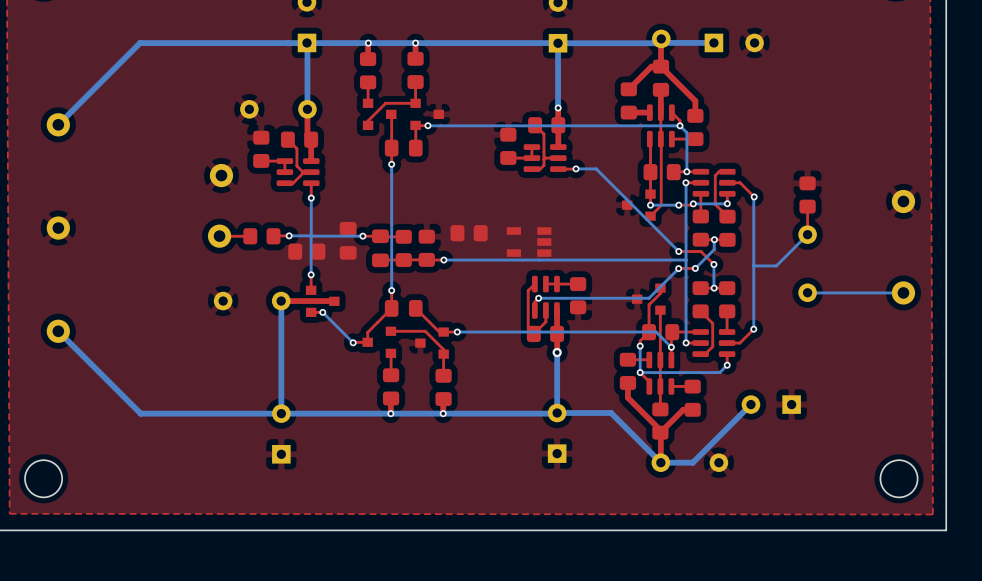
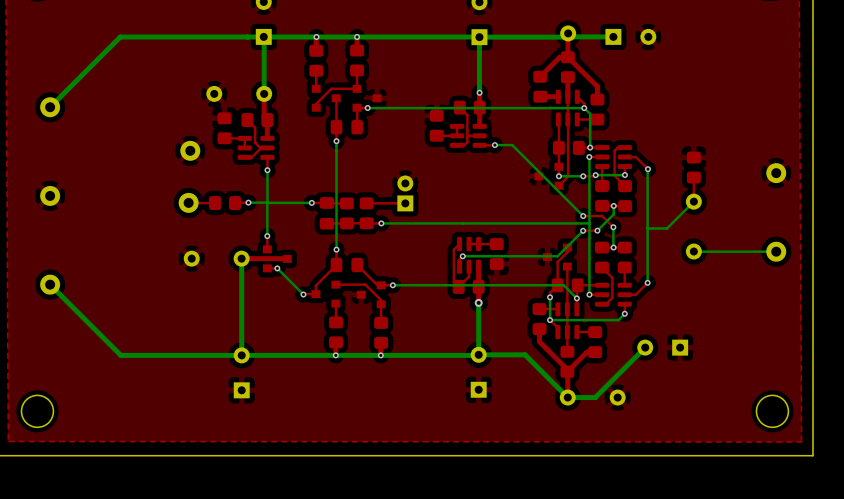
part footprint: [450, 225, 488, 242] -> [397, 175, 414, 212]
top track: none -> (405, 203) (366, 203)
part: (348, 240) -> none
part: (529, 242) -> none
part: (306, 251) -> none

